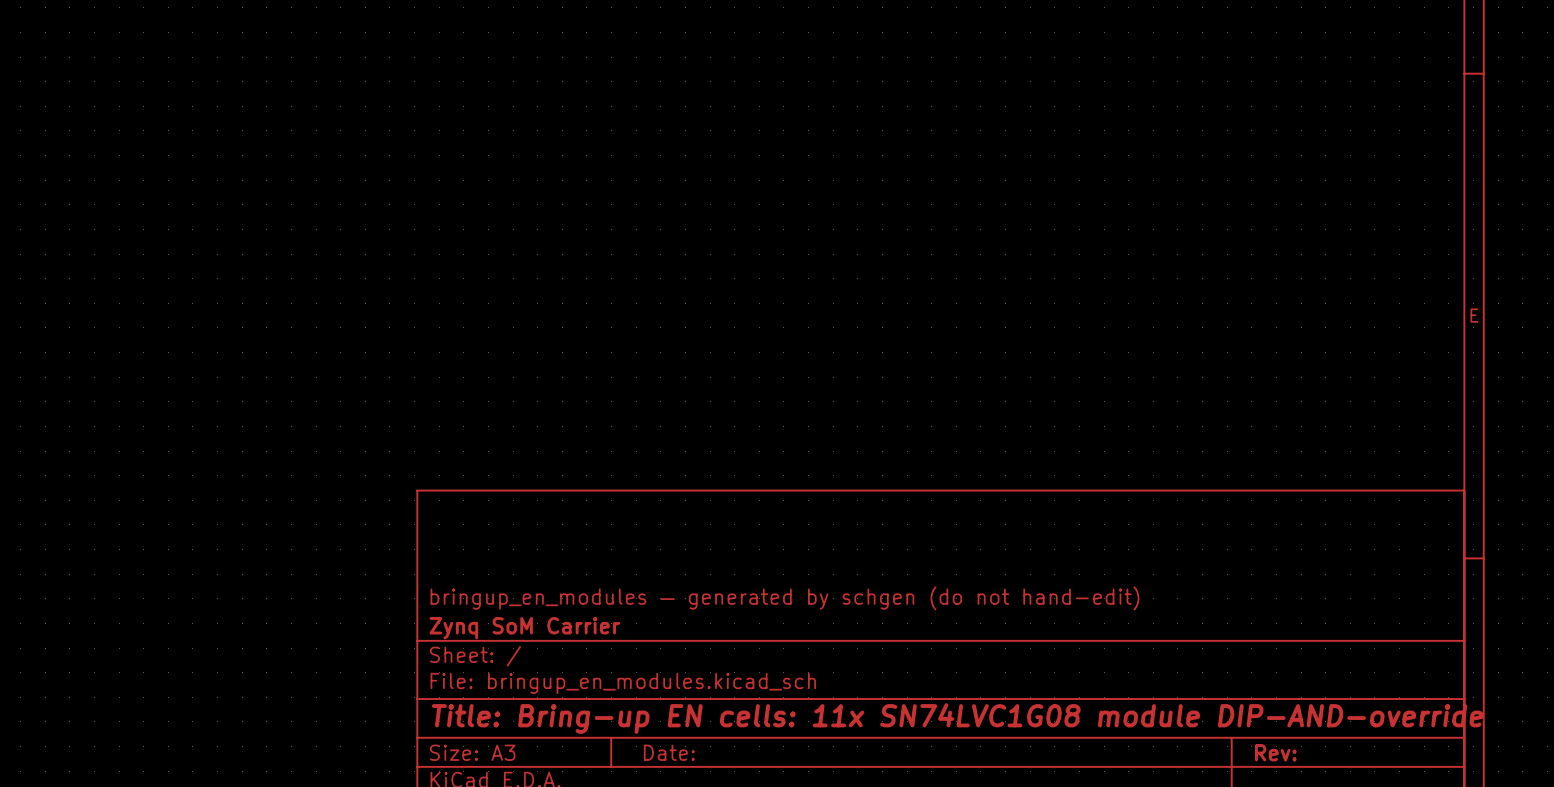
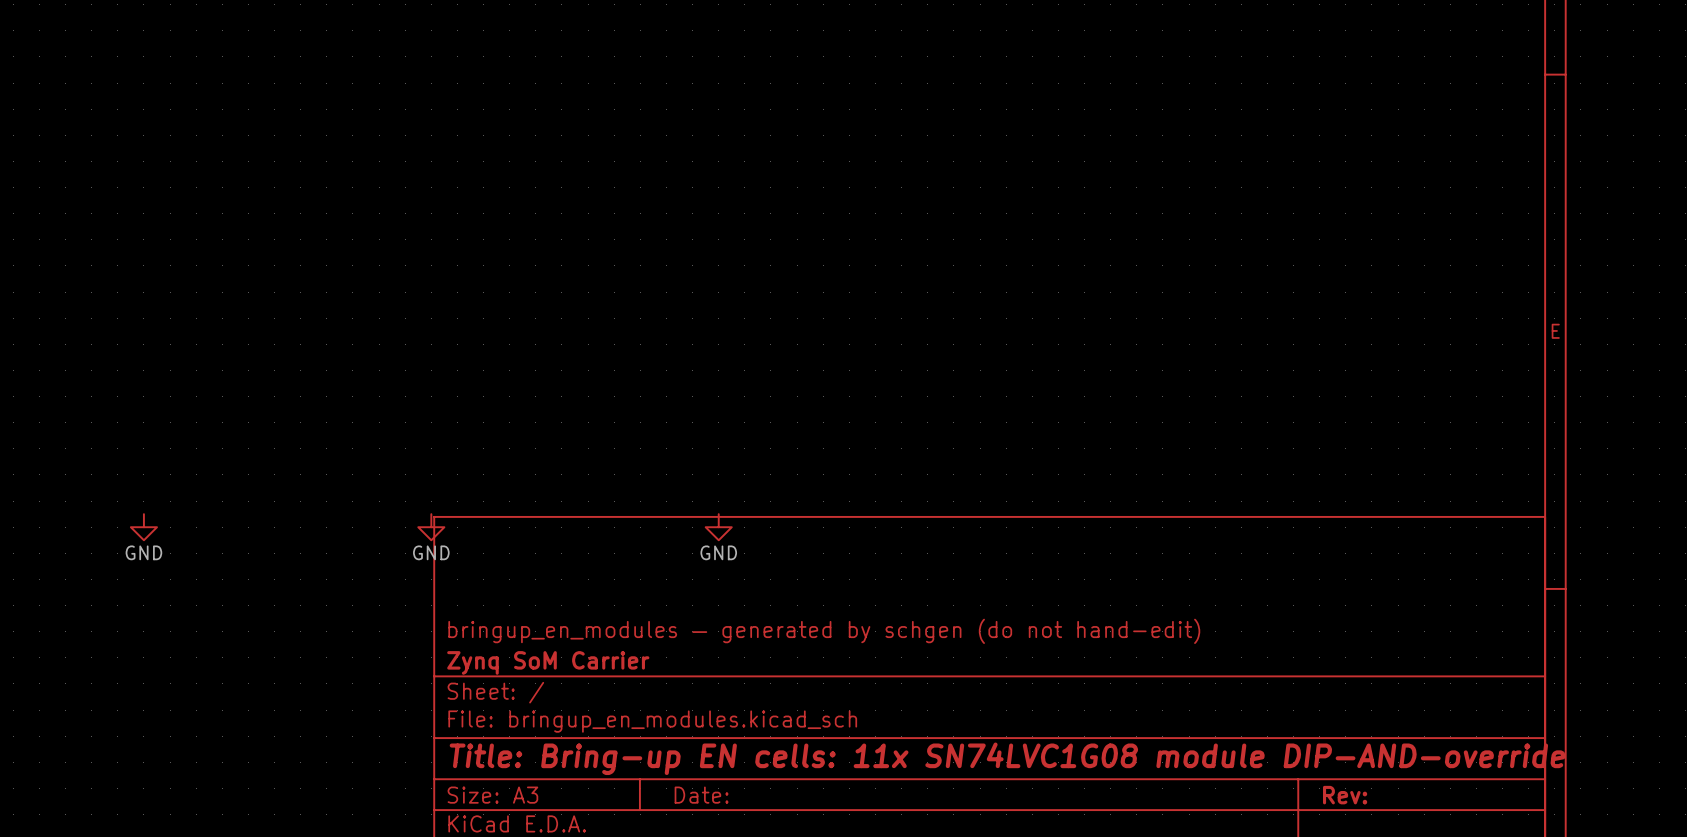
power symbol: none -> GND (143, 527)
power symbol: none -> GND (431, 527)
power symbol: none -> GND (718, 527)

